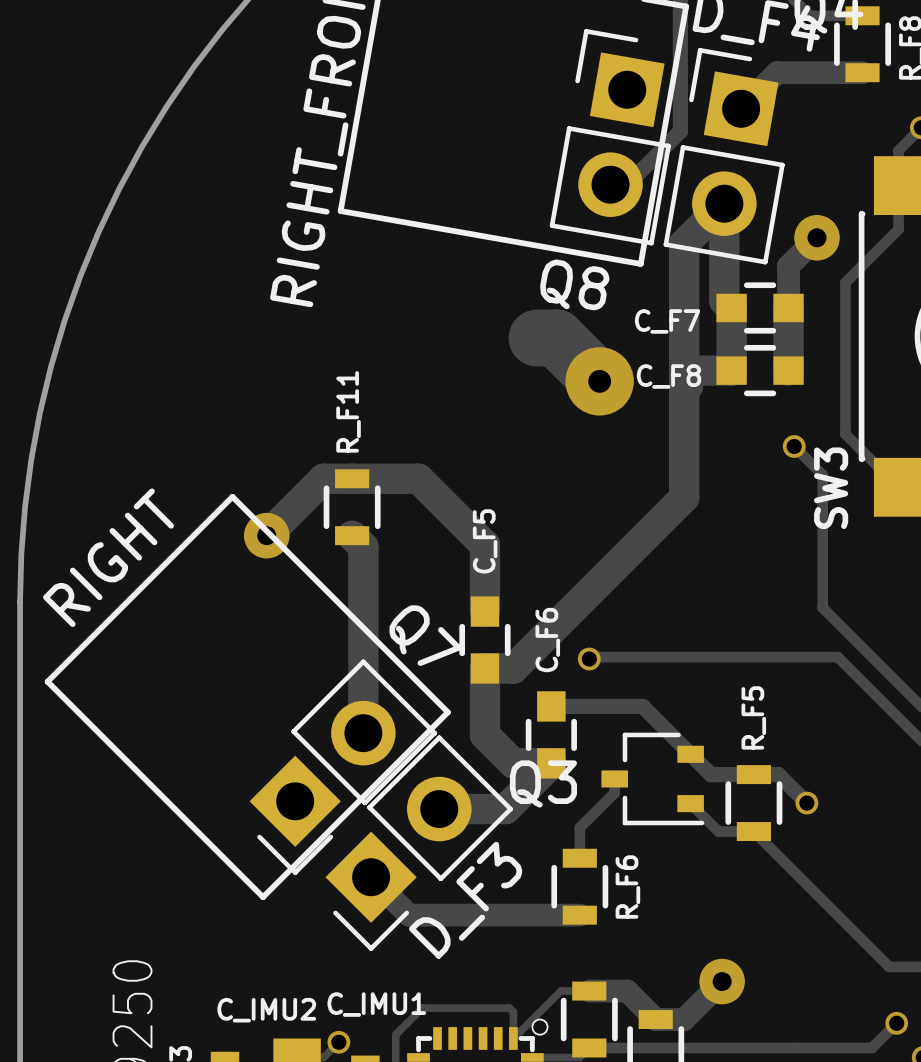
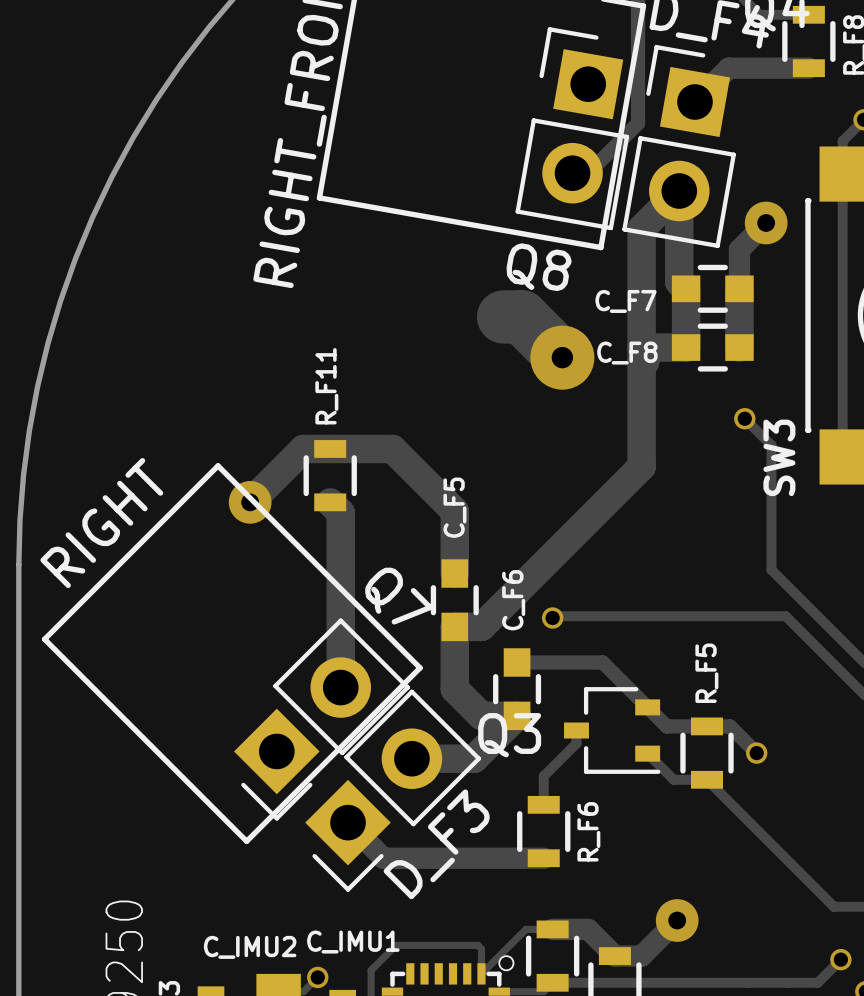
track: (898, 229) (845, 282) (845, 434) (898, 487) -> (842, 215) (842, 456)

